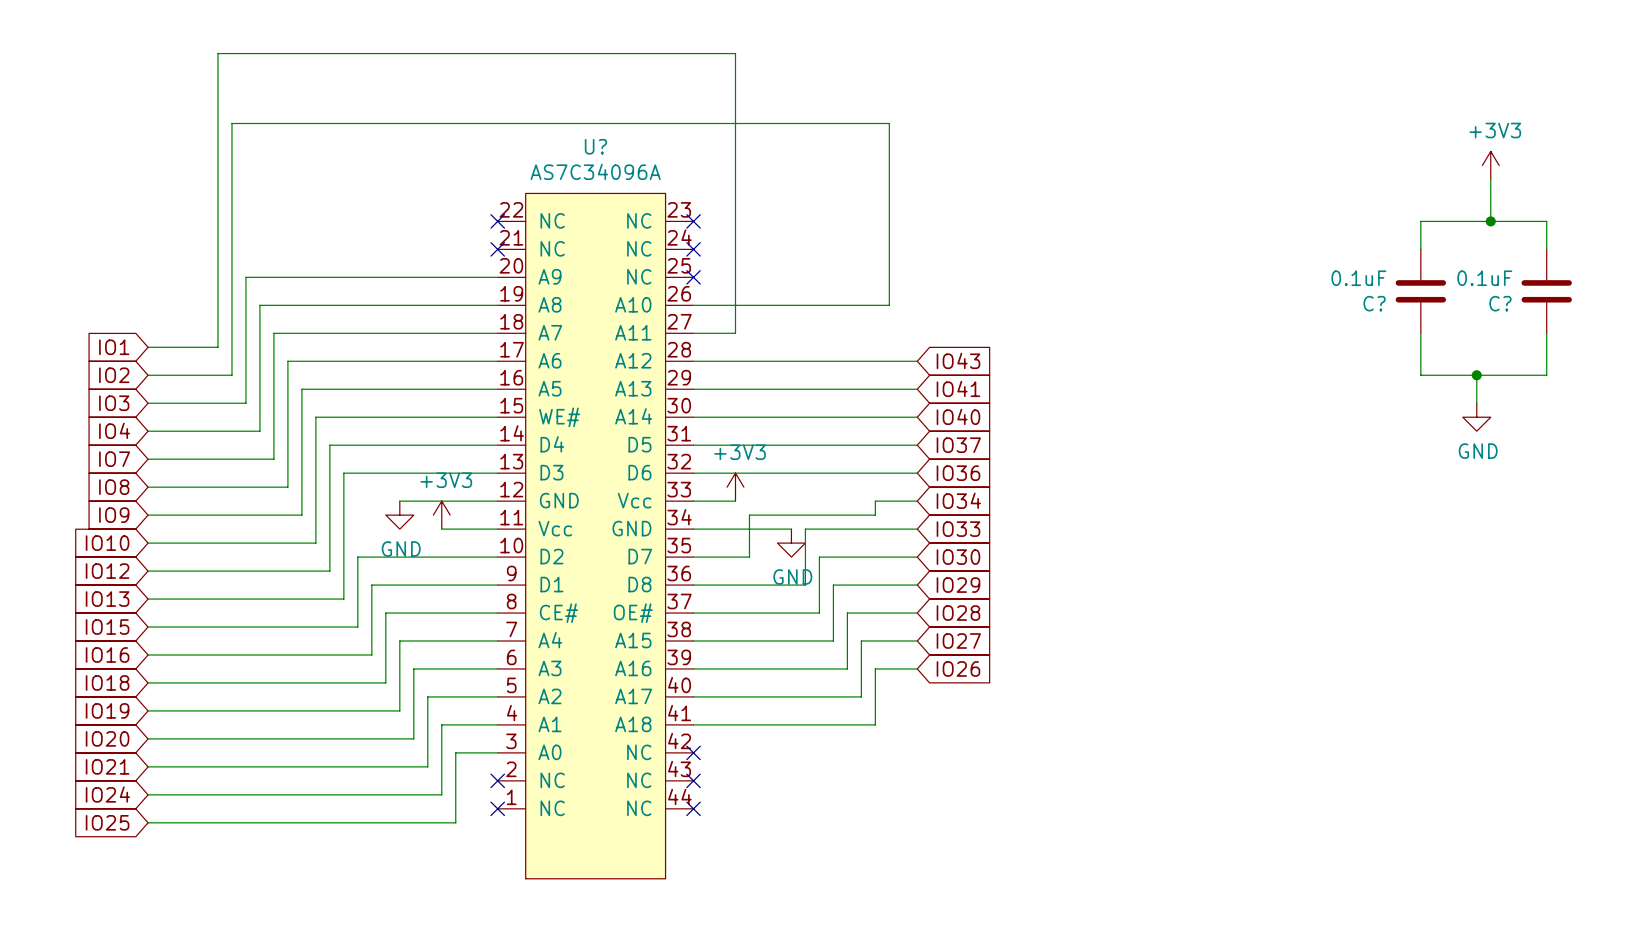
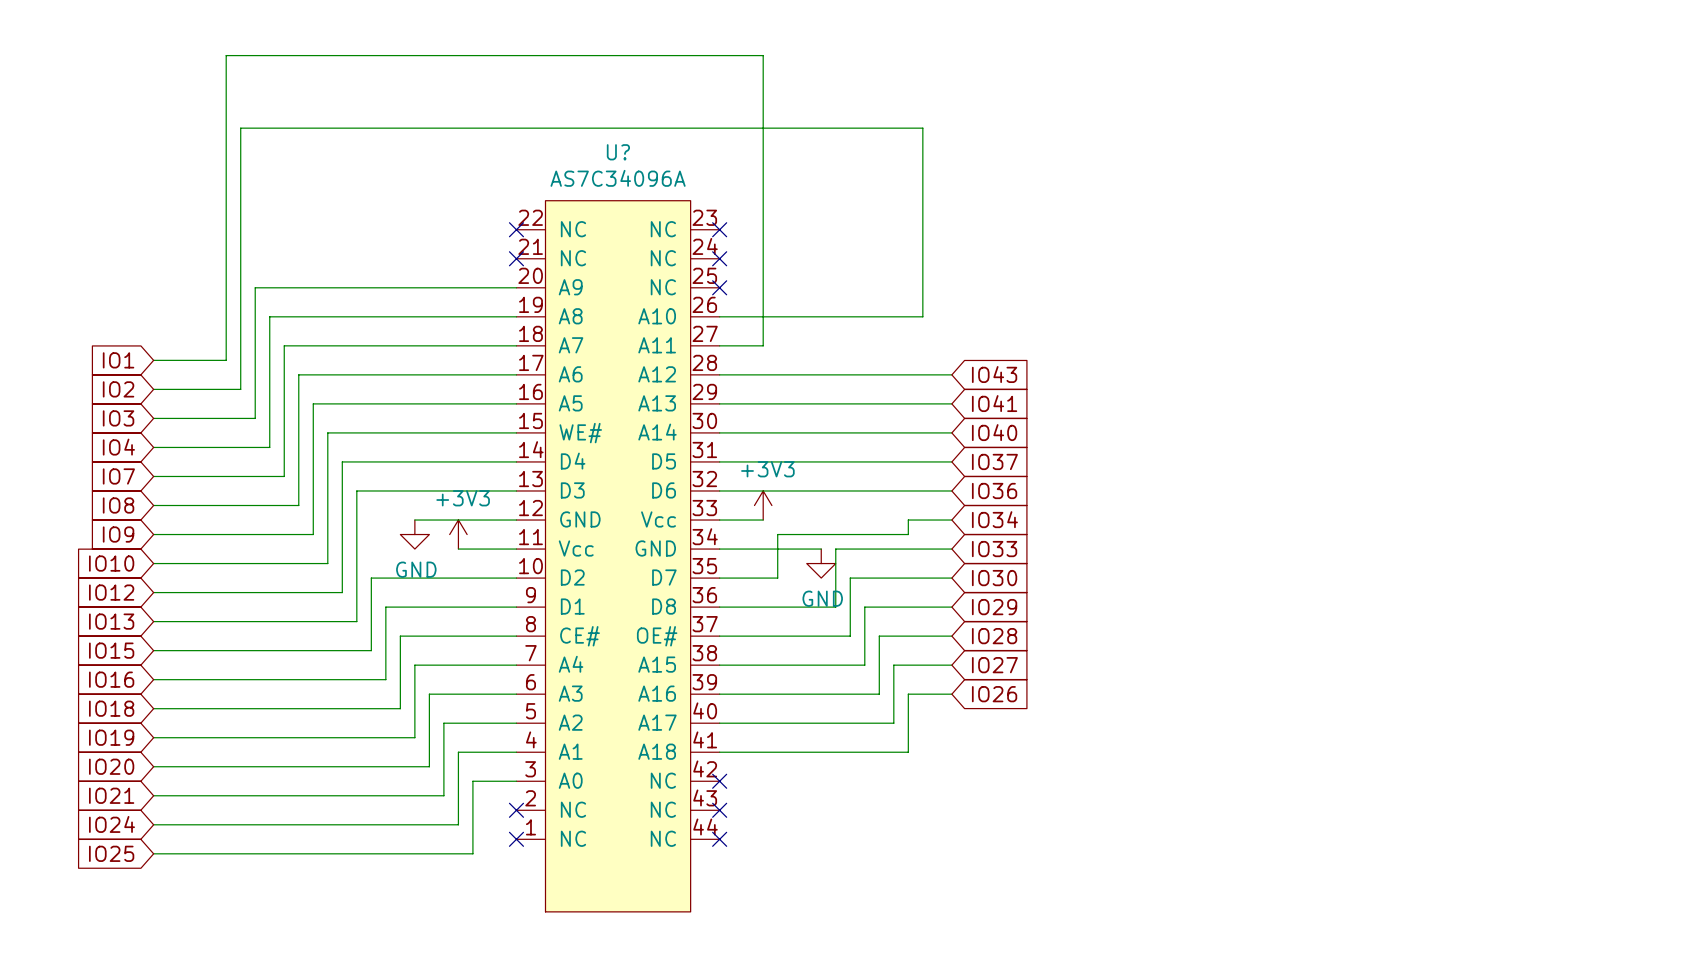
power symbol: +3V3 (1490, 165) -> none
wire: (1490, 179) (1490, 221) -> none
junction: (1490, 221) -> none
wire: (1420, 249) (1420, 221) (1546, 221) (1546, 249) -> none
C?: 0.1uF (1420, 291) -> none
C?: 0.1uF (1546, 291) -> none
wire: (1420, 333) (1420, 375) (1546, 375) (1546, 333) -> none
wire: (1476, 375) (1476, 403) -> none
junction: (1476, 375) -> none
power symbol: GND (1476, 417) -> none

